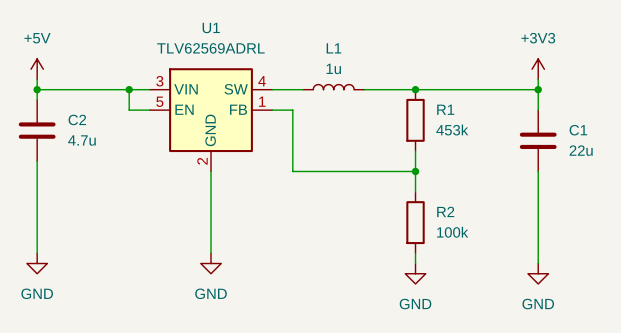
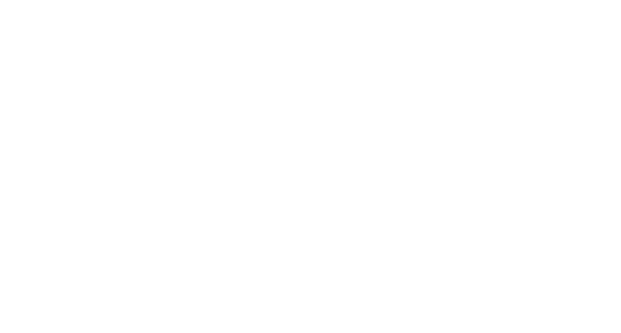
power symbol: +5V (37, 69) -> none
power symbol: +3V3 (538, 69) -> none
wire: (37, 79) (37, 99) -> none
wire: (538, 79) (538, 110) -> none
L1: 1u (333, 87) -> none
wire: (37, 89) (149, 89) -> none
junction: (37, 89) -> none
wire: (129, 89) (129, 110) (149, 110) -> none
junction: (129, 89) -> none
wire: (272, 89) (303, 89) -> none
wire: (364, 89) (538, 89) -> none
junction: (415, 89) -> none
junction: (538, 89) -> none
wire: (272, 110) (292, 110) (292, 171) (415, 171) -> none
U1: TLV62569ADRL (211, 119) -> none
R1: 453k (415, 120) -> none
C2: 4.7u (37, 130) -> none
C1: 22u (538, 140) -> none
wire: (415, 151) (415, 191) -> none
wire: (37, 161) (37, 253) -> none
wire: (211, 171) (211, 253) -> none
junction: (415, 171) -> none
wire: (538, 171) (538, 263) -> none
R2: 100k (415, 222) -> none
wire: (415, 253) (415, 263) -> none
power symbol: GND (37, 263) -> none
power symbol: GND (211, 263) -> none
power symbol: GND (415, 273) -> none
power symbol: GND (538, 273) -> none

